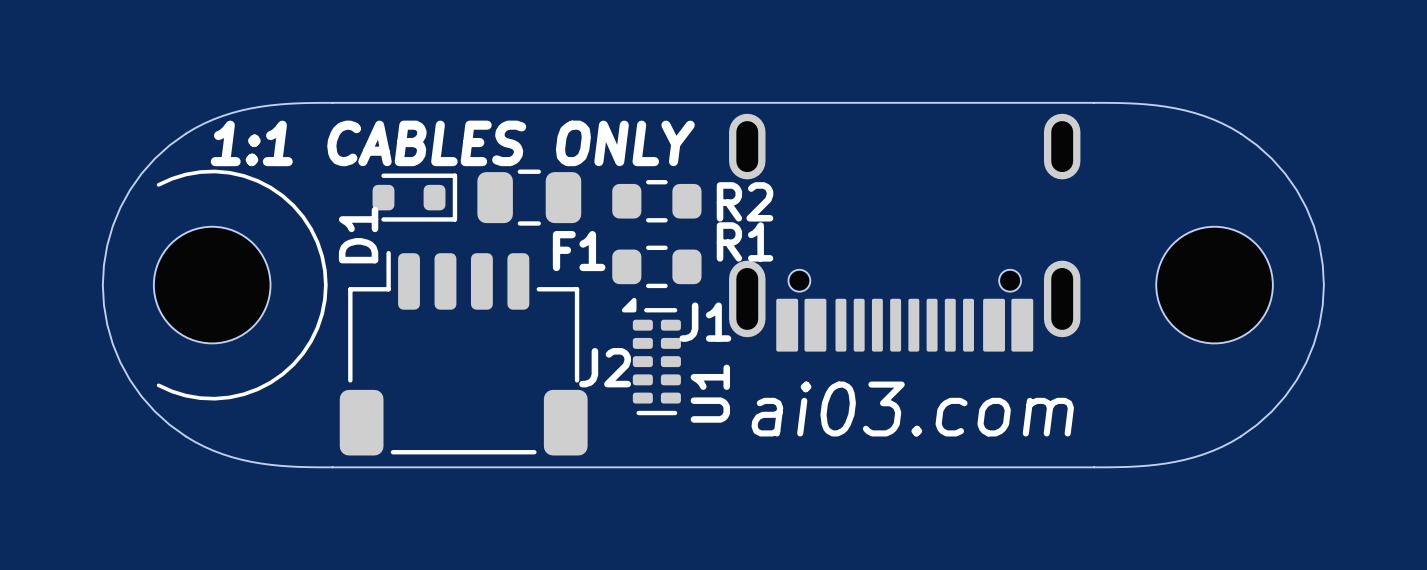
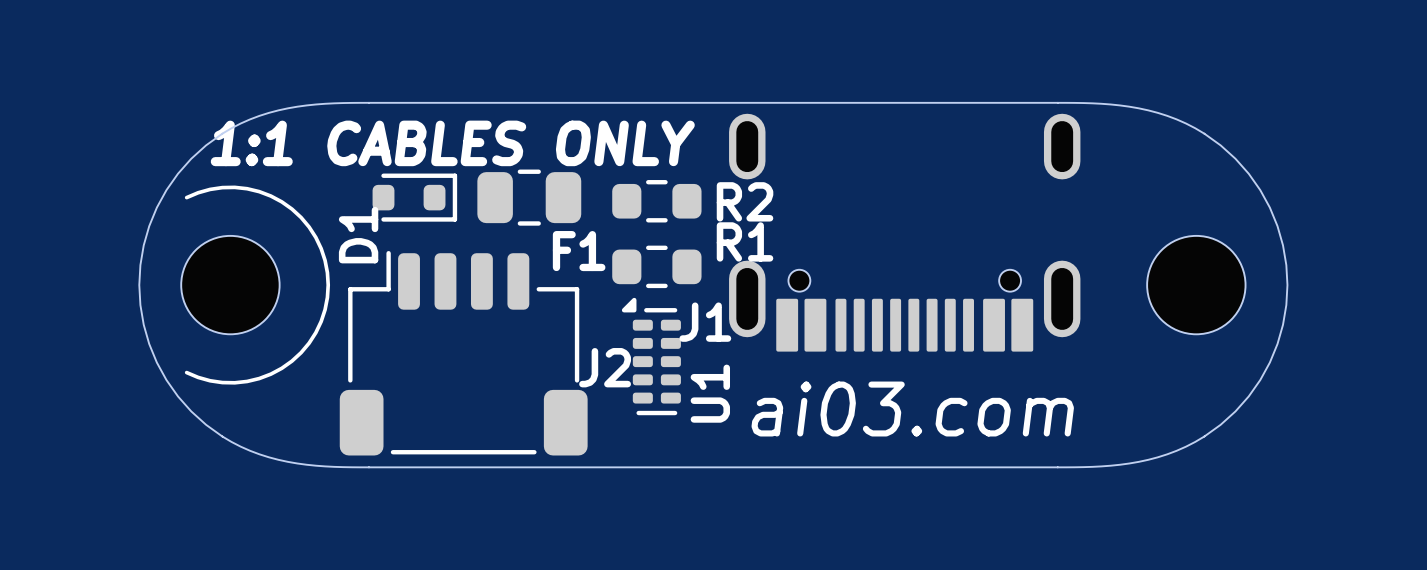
board edge: (368, 102) (297, 103) (260, 106) (223, 115) (185, 133) (154, 158) (141, 173) (120, 207) (107, 245) (102, 285) (107, 324) (120, 362) (141, 396) (169, 424) (185, 436) (223, 454) (260, 463) (297, 466) (368, 467) -> (368, 102) (316, 104) (278, 110) (240, 123) (206, 145) (177, 173) (156, 207) (143, 245) (139, 285) (143, 324) (156, 362) (177, 396) (206, 424) (240, 446) (278, 459) (316, 465) (368, 467)
board edge: (1057, 102) (1128, 103) (1165, 106) (1203, 115) (1240, 133) (1271, 158) (1296, 190) (1313, 226) (1319, 245) (1323, 285) (1322, 305) (1313, 344) (1296, 380) (1271, 411) (1240, 436) (1203, 454) (1165, 463) (1128, 466) (1057, 467) -> (1057, 102) (1110, 104) (1148, 110) (1185, 123) (1220, 145) (1248, 173) (1269, 207) (1283, 245) (1287, 285) (1283, 324) (1269, 362) (1248, 396) (1220, 424) (1185, 446) (1148, 459) (1110, 465) (1057, 467)
line: (158, 184) (185, 174) (214, 171) (243, 175) (270, 187) (293, 205) (311, 229) (322, 256) (325, 285) (322, 314) (311, 341) (293, 364) (270, 382) (243, 394) (214, 398) (185, 395) (158, 385) -> none
line: none -> (186, 197) (210, 189) (234, 187) (259, 191) (281, 201) (301, 217) (315, 237) (325, 260) (328, 285) (325, 309) (315, 332) (301, 352) (281, 368) (259, 378) (234, 382) (210, 380) (186, 372)
part footprint: [153, 226, 271, 344] -> [181, 235, 280, 335]
part footprint: [1156, 226, 1273, 344] -> [1147, 235, 1246, 335]

